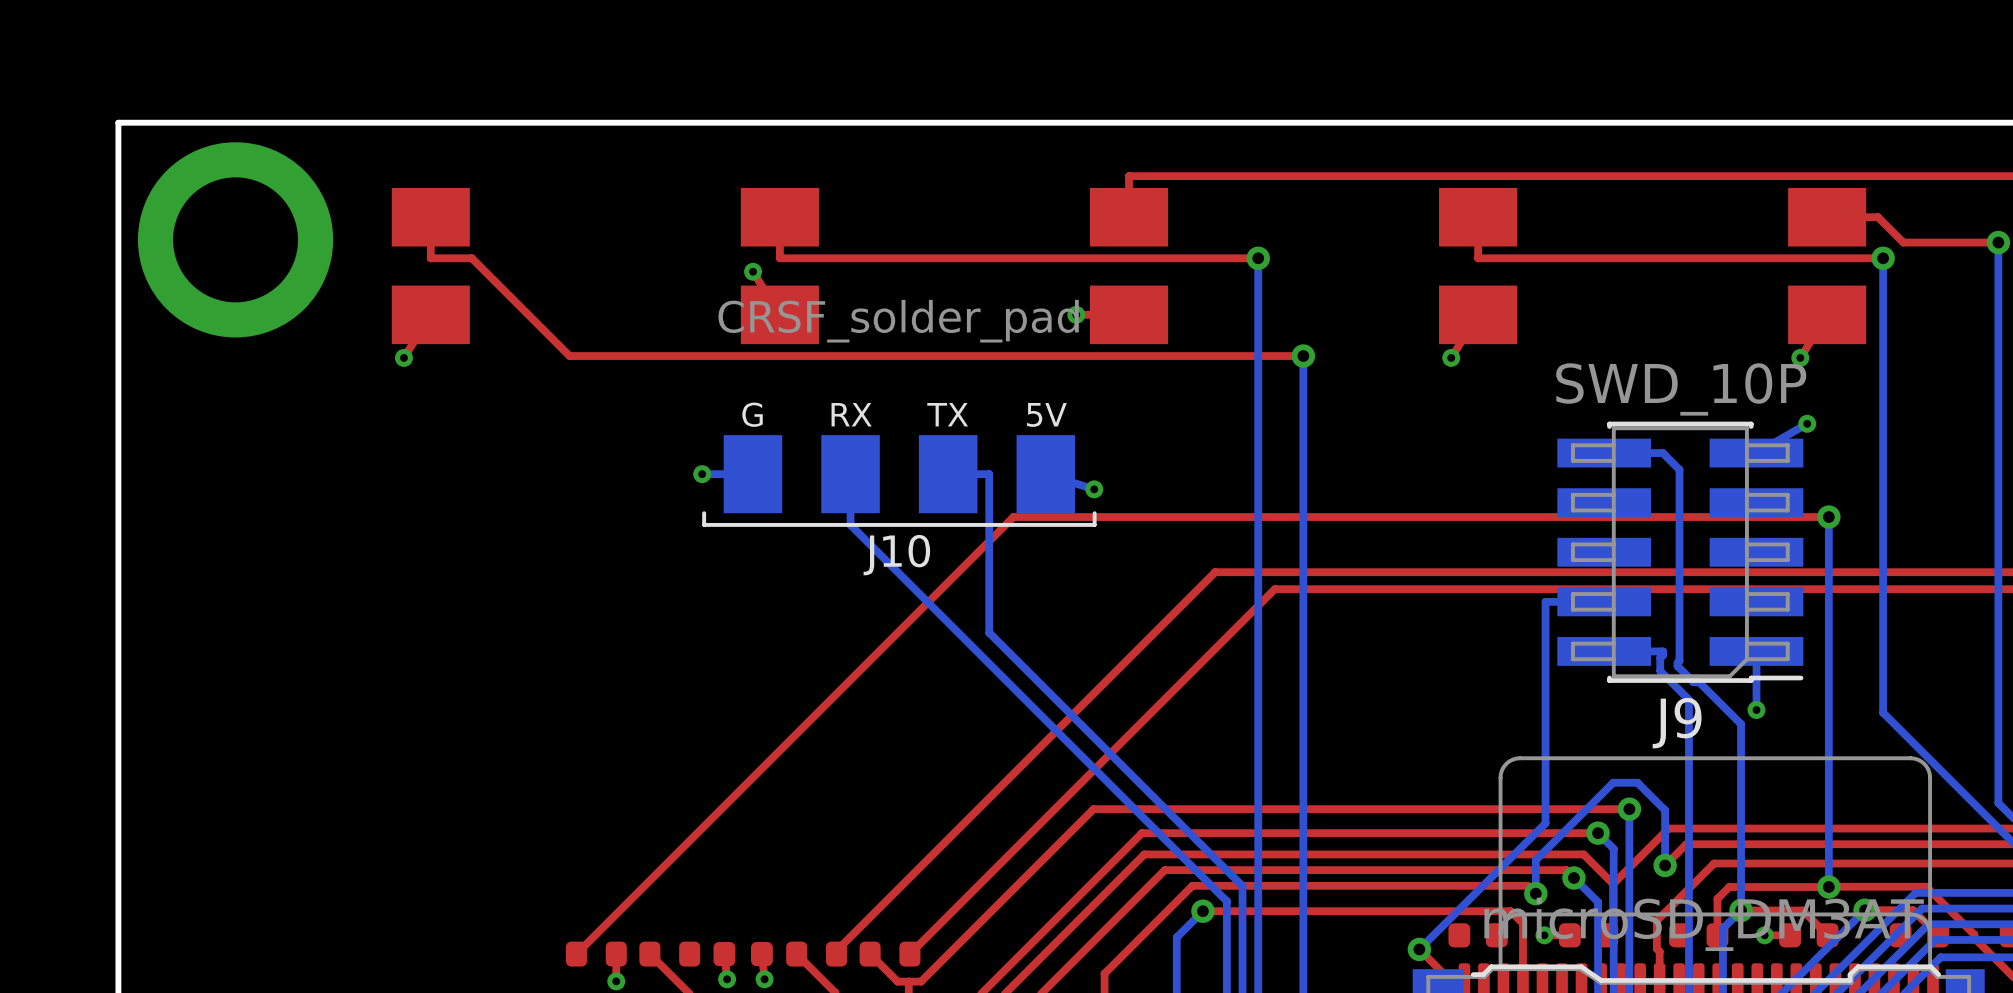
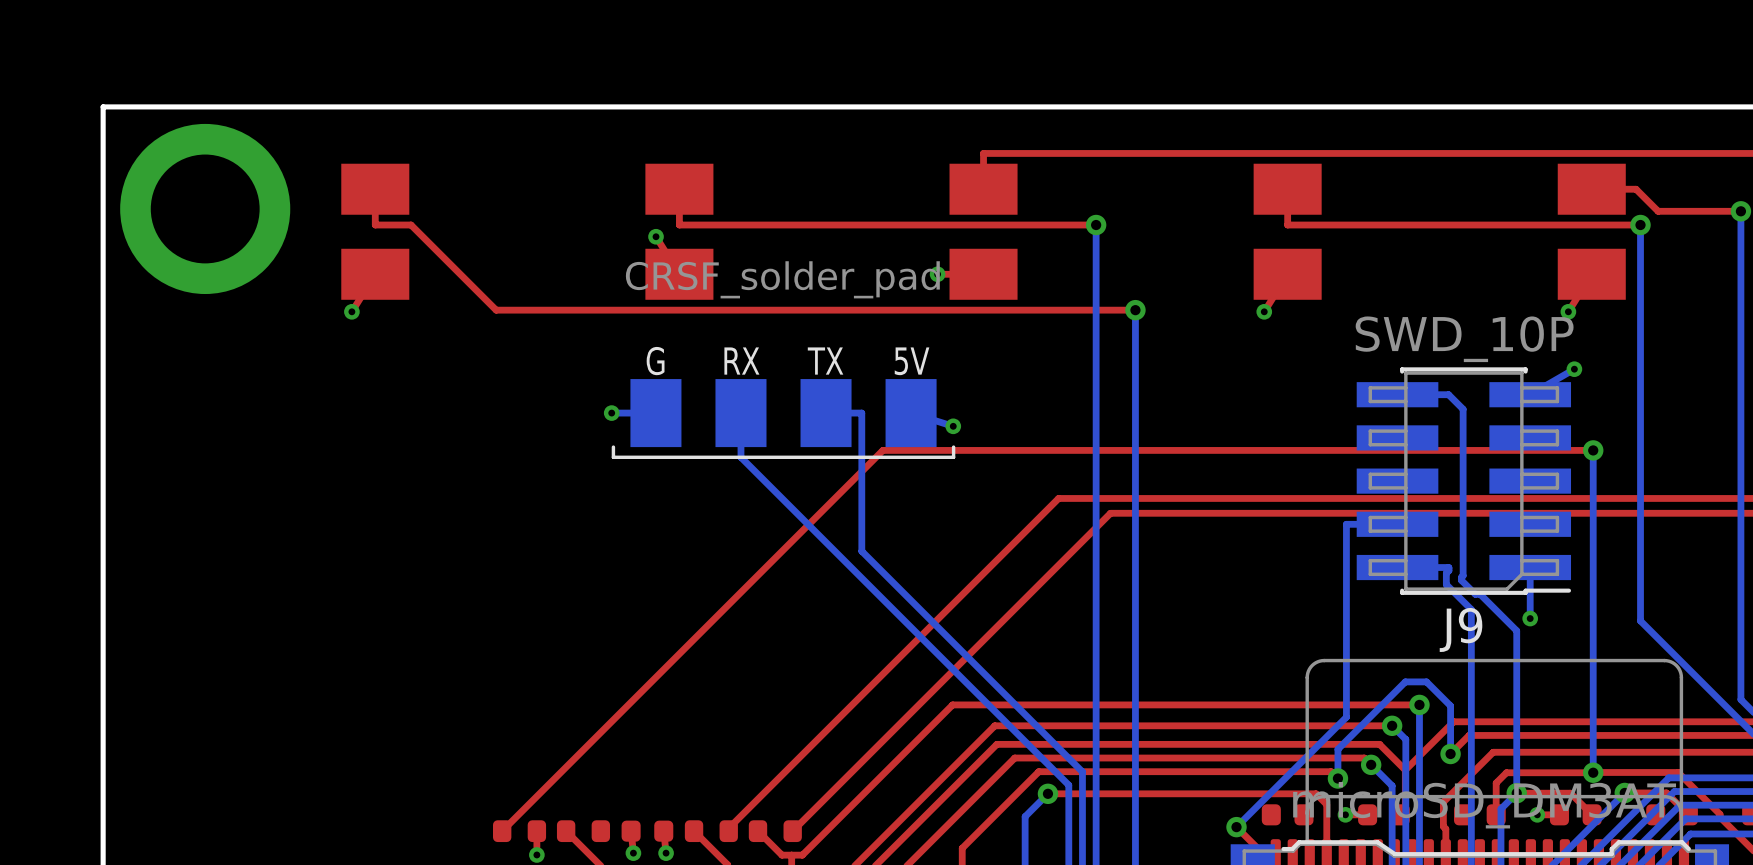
J10 footprint: [702, 435, 1097, 527] -> [611, 379, 956, 460]
J10 name: J10 (896, 555) -> none

